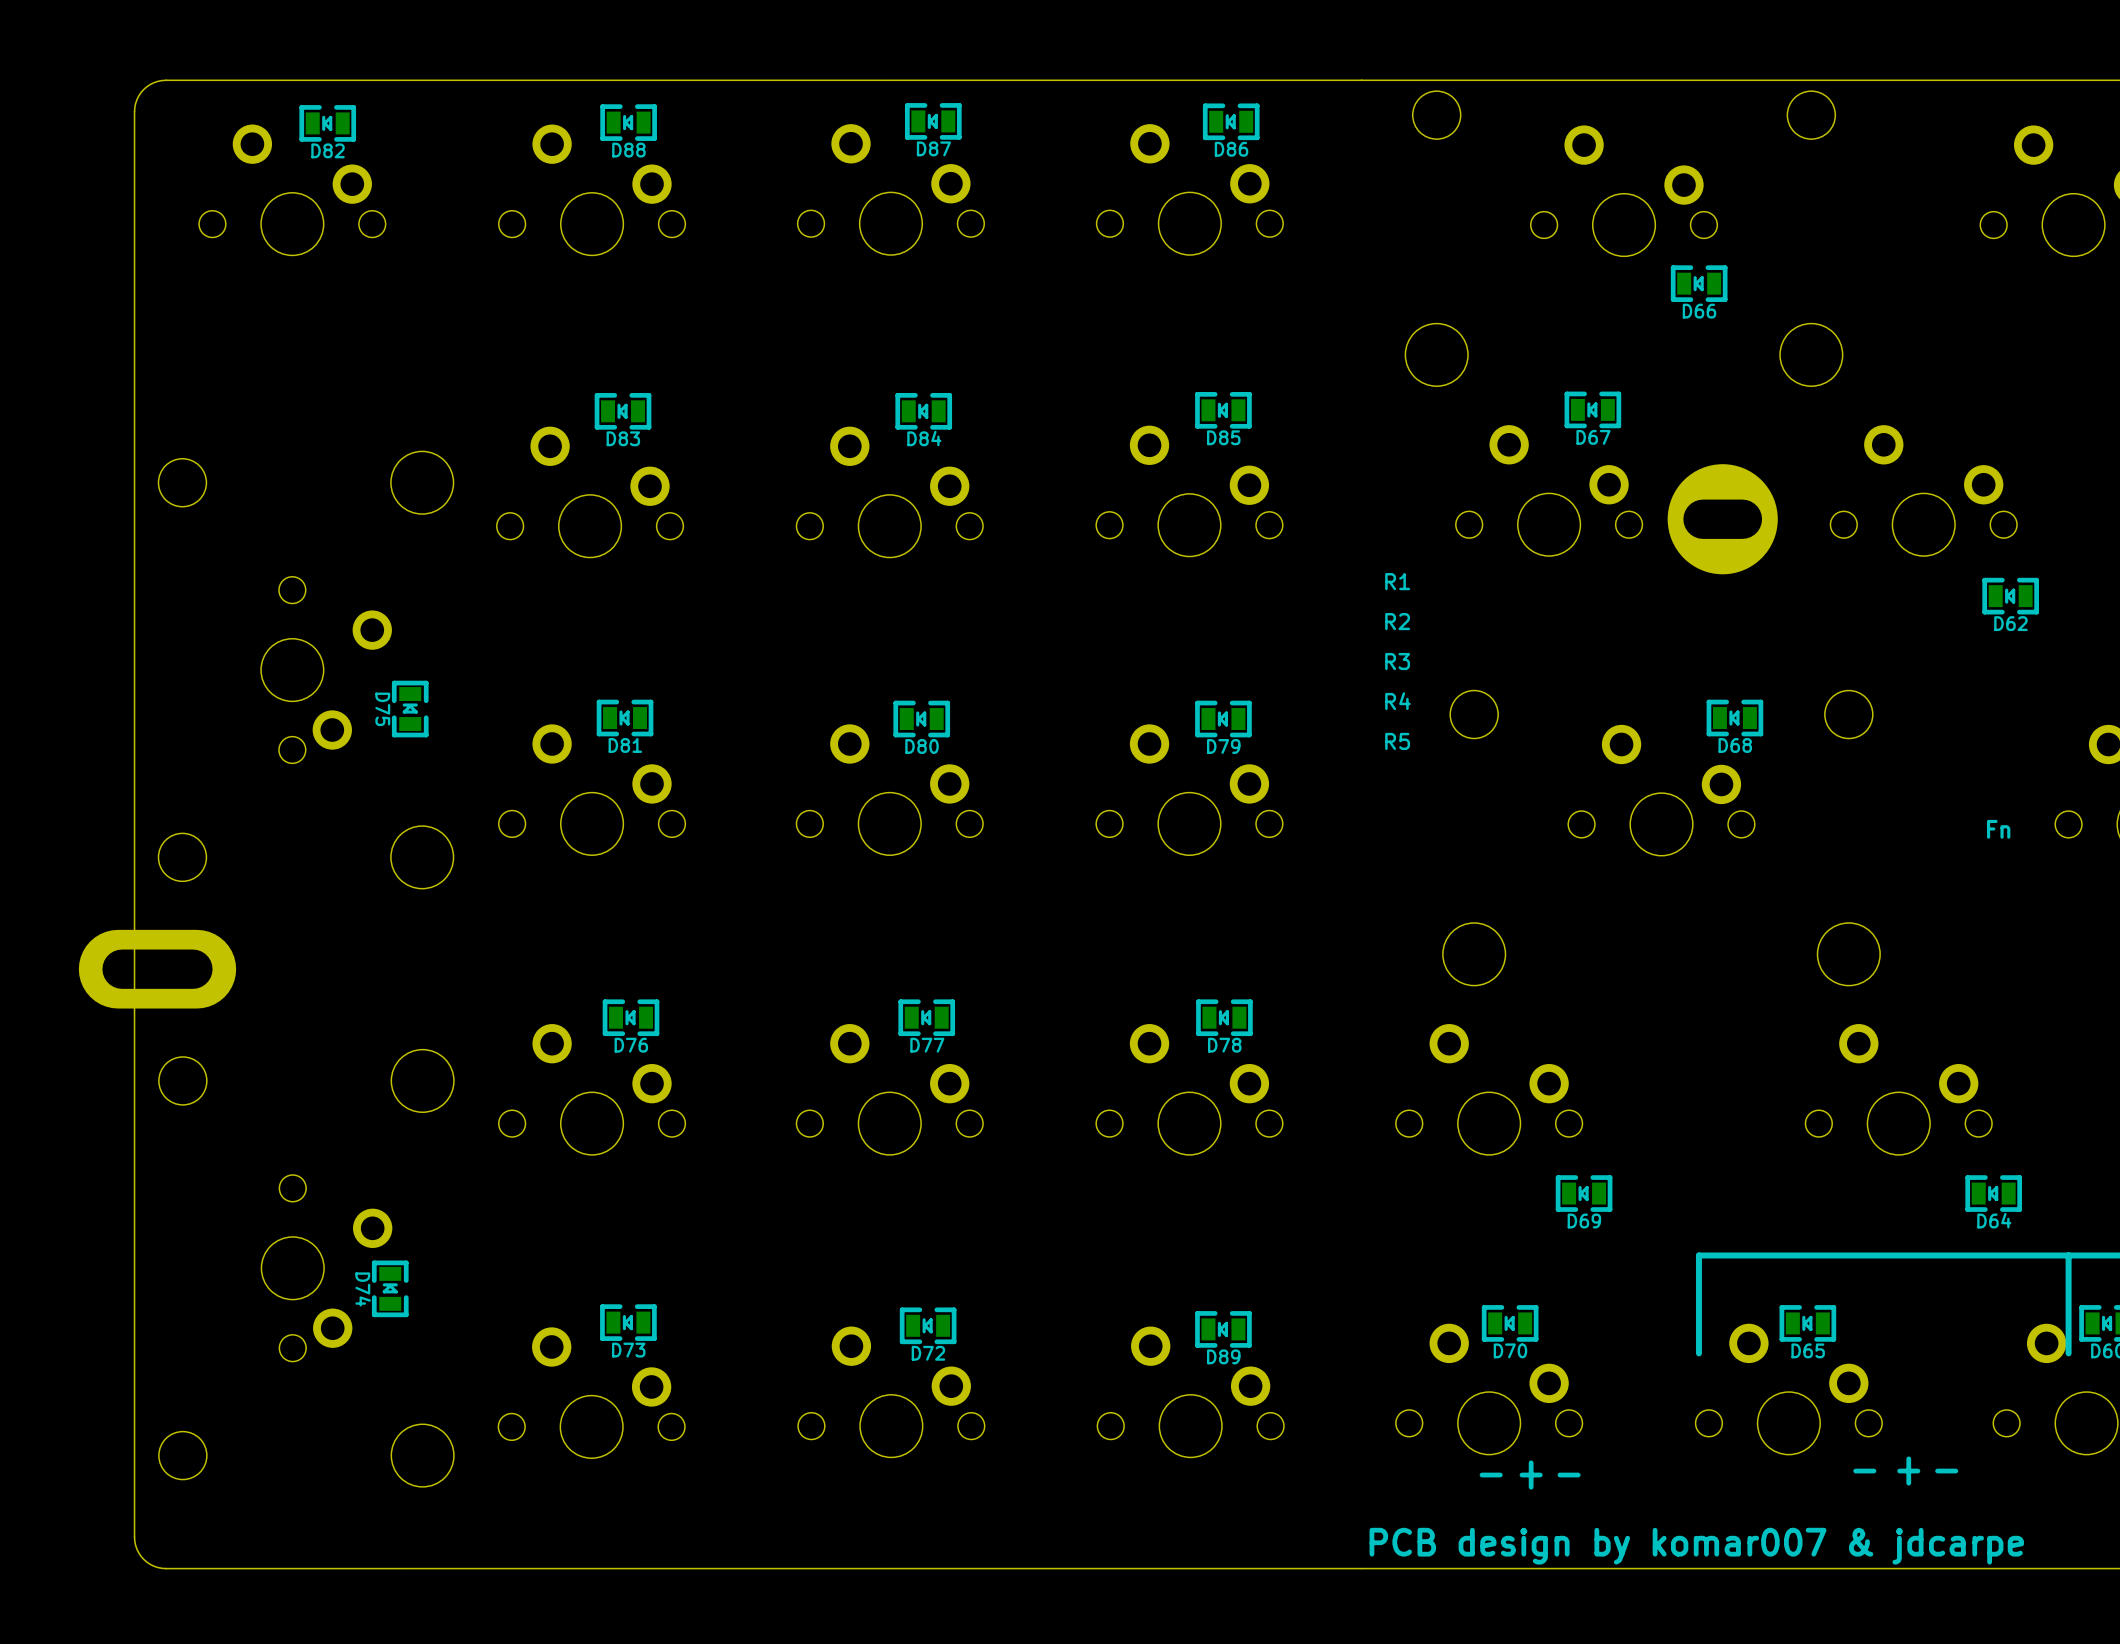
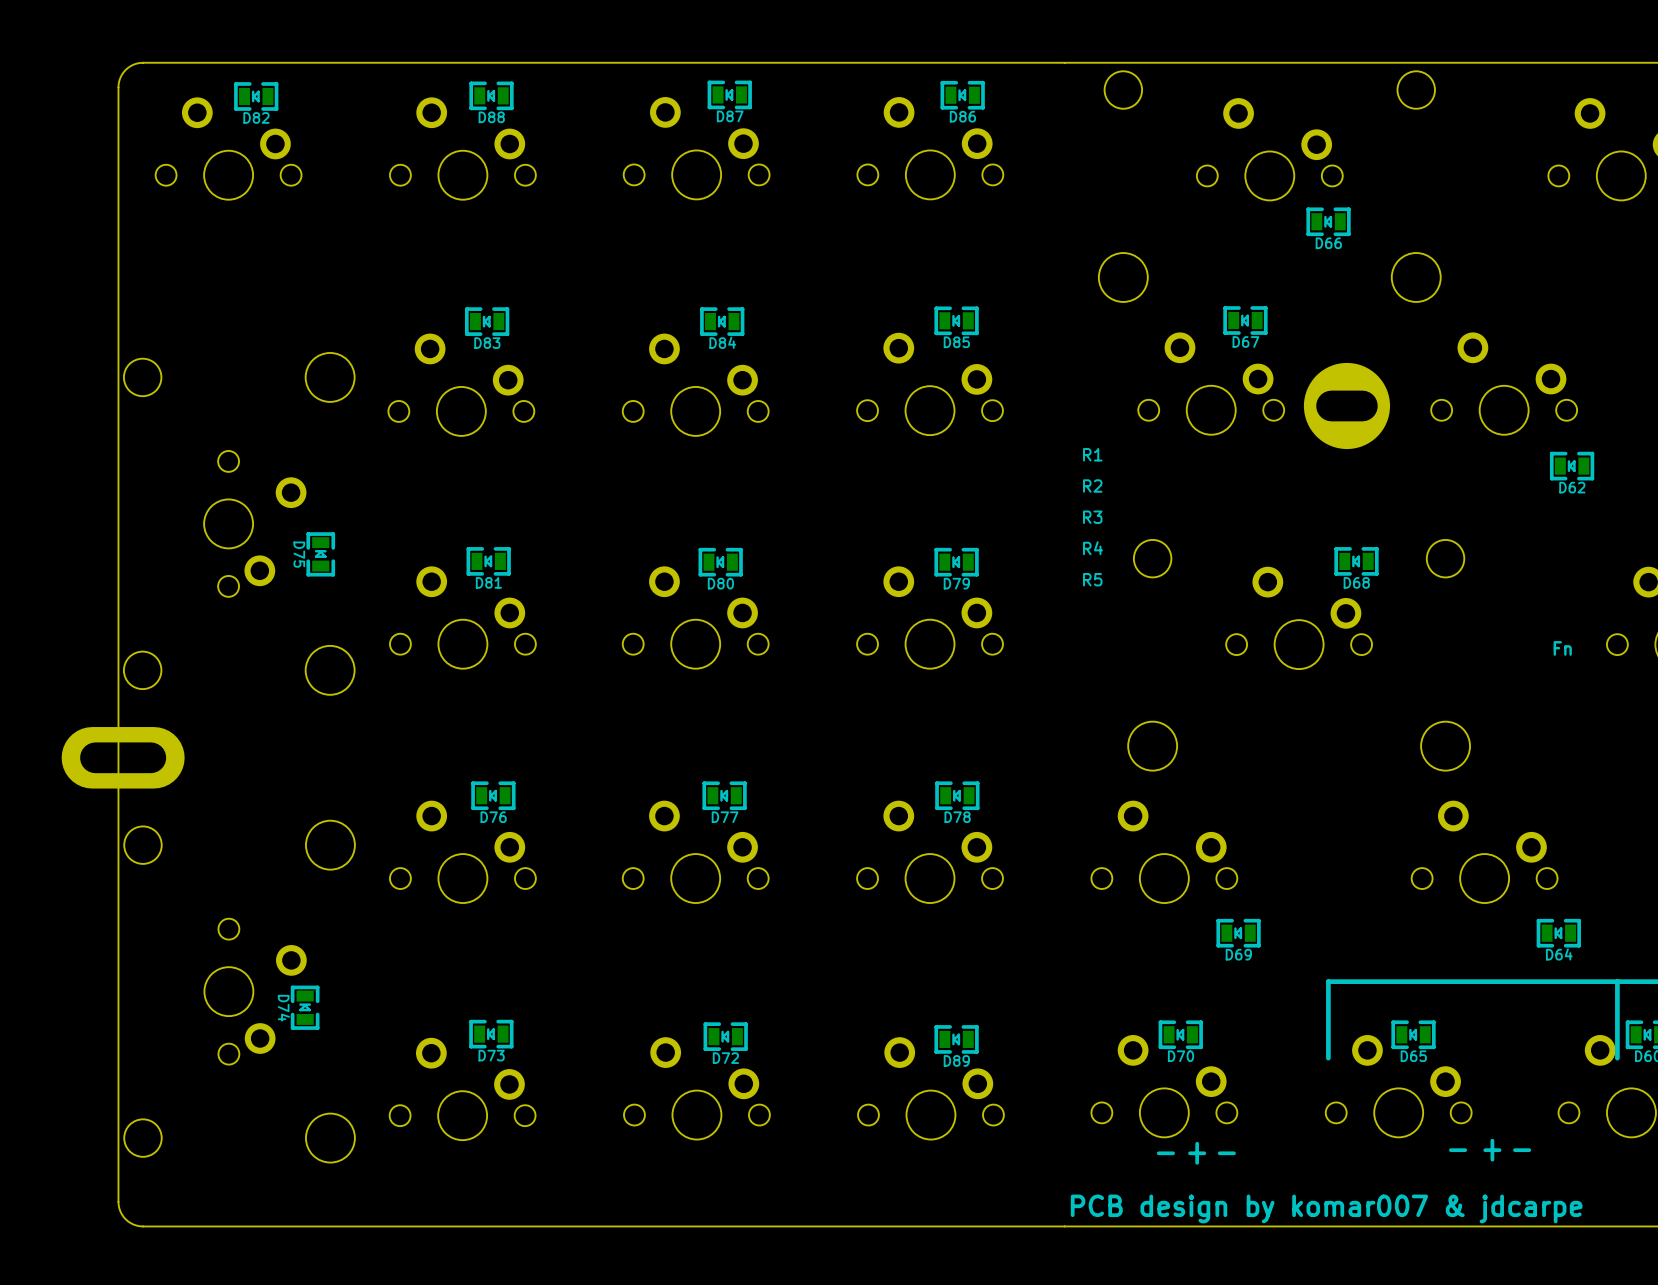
board edge: (1361, 80) (165, 80) (153, 82) (141, 92) (135, 103) (134, 111) (134, 1537) (138, 1552) (150, 1564) (161, 1568) (182, 1568) -> (1064, 62) (143, 62) (133, 64) (123, 72) (118, 87) (118, 1201) (120, 1211) (125, 1219) (133, 1224) (143, 1226)

